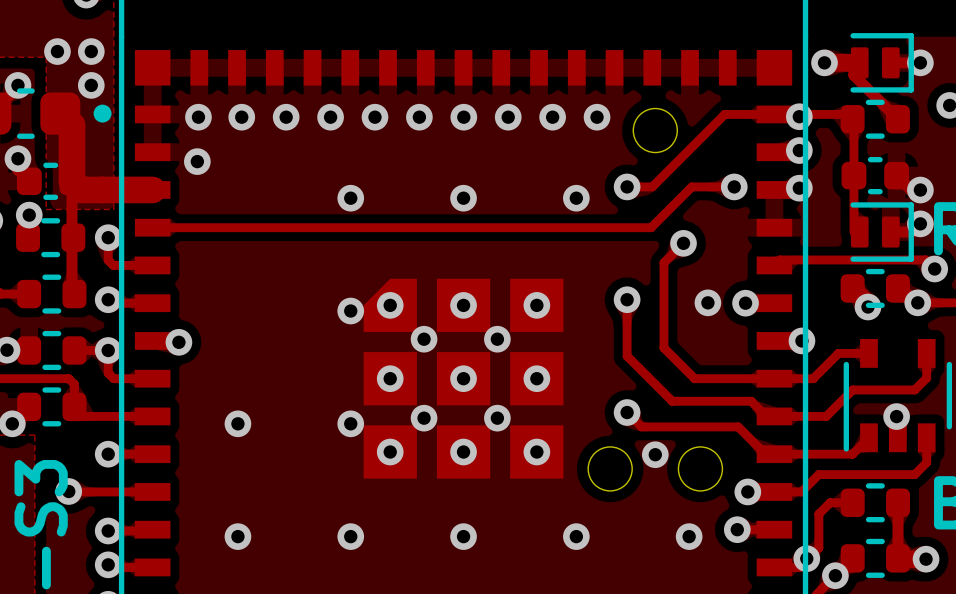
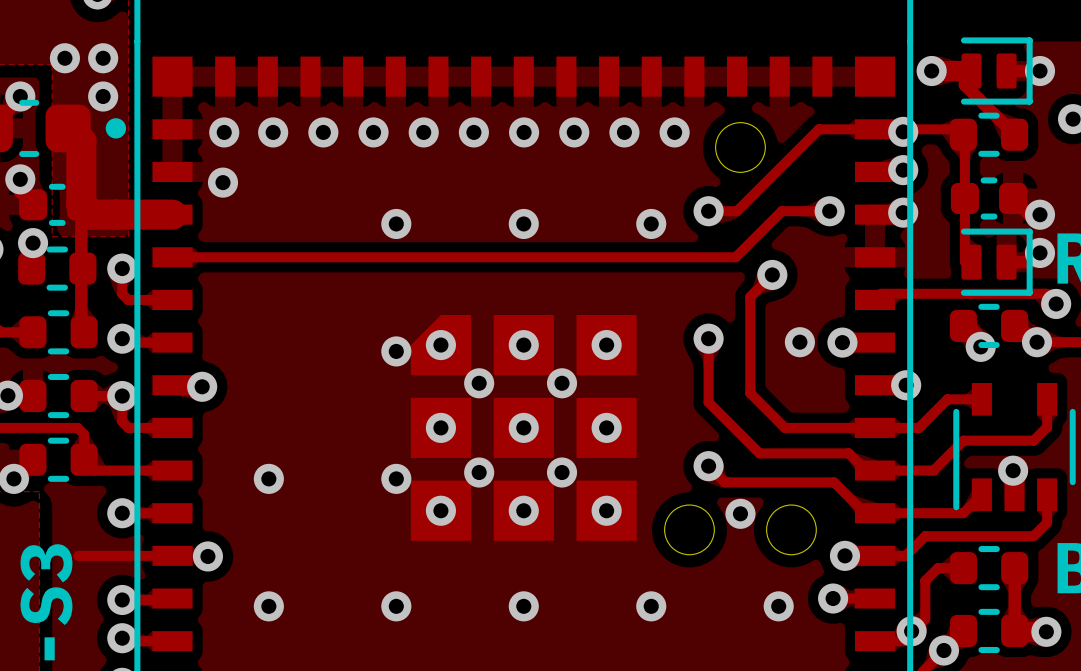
via position: (68, 491) -> (207, 556)

